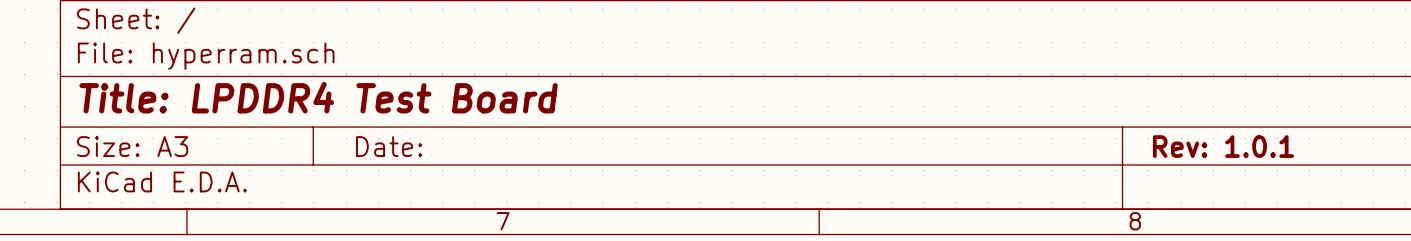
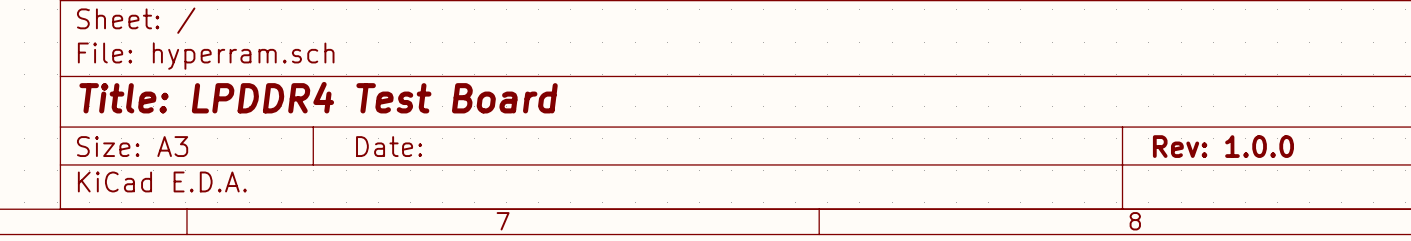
title block: Rev: 1.0.1 (1223, 146) -> Rev: 1.0.0 (1223, 146)

